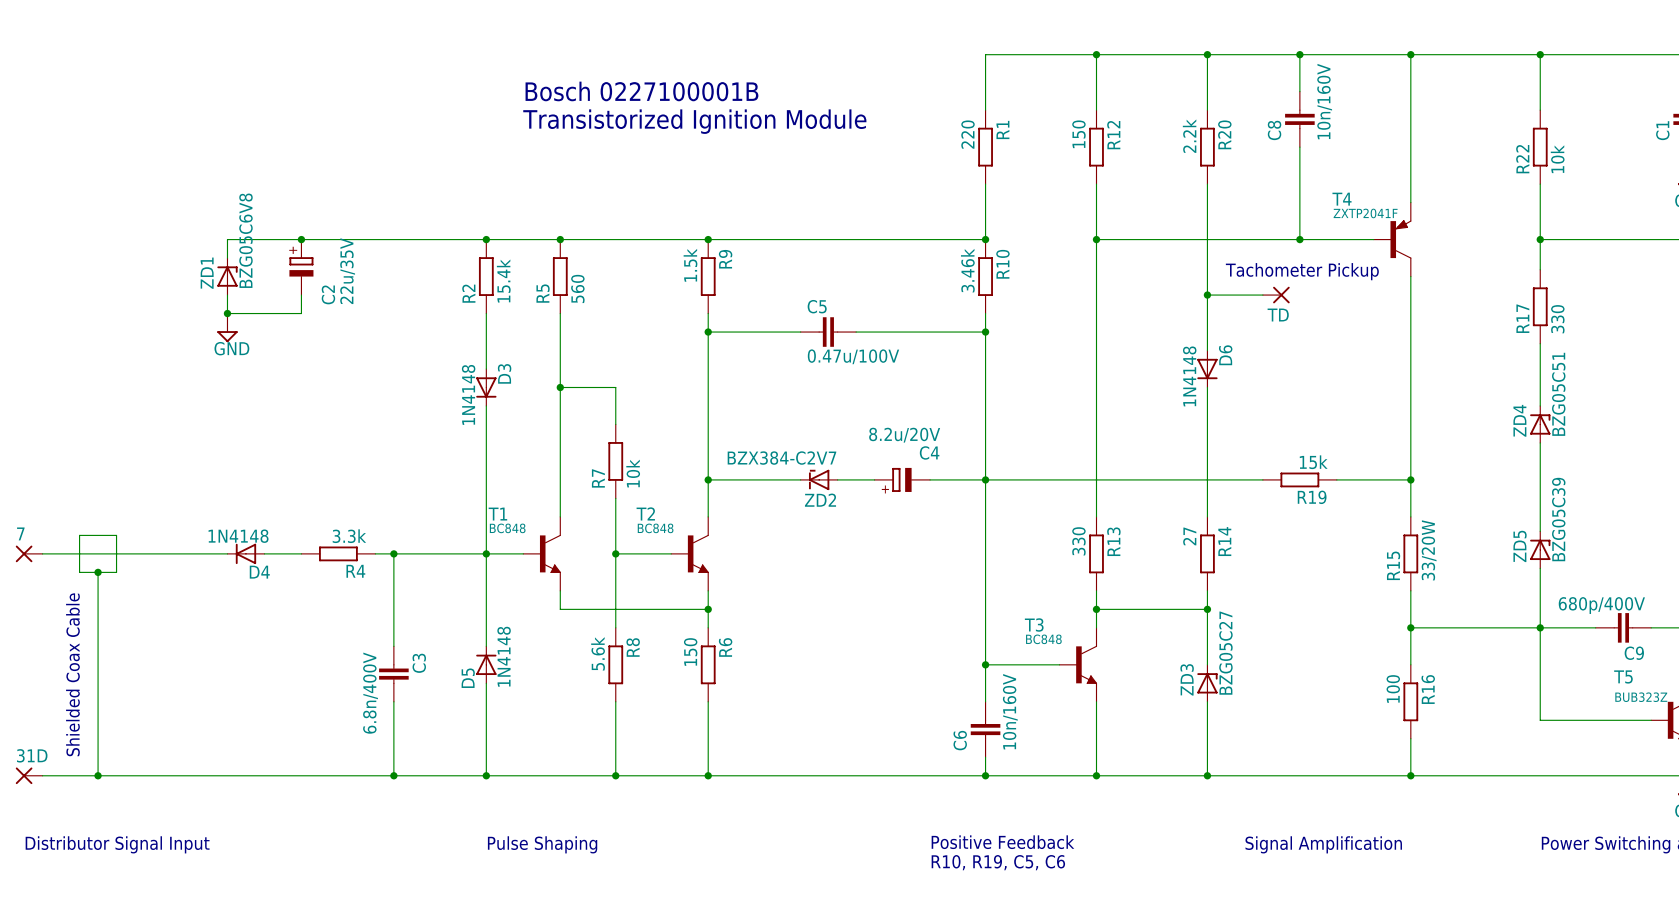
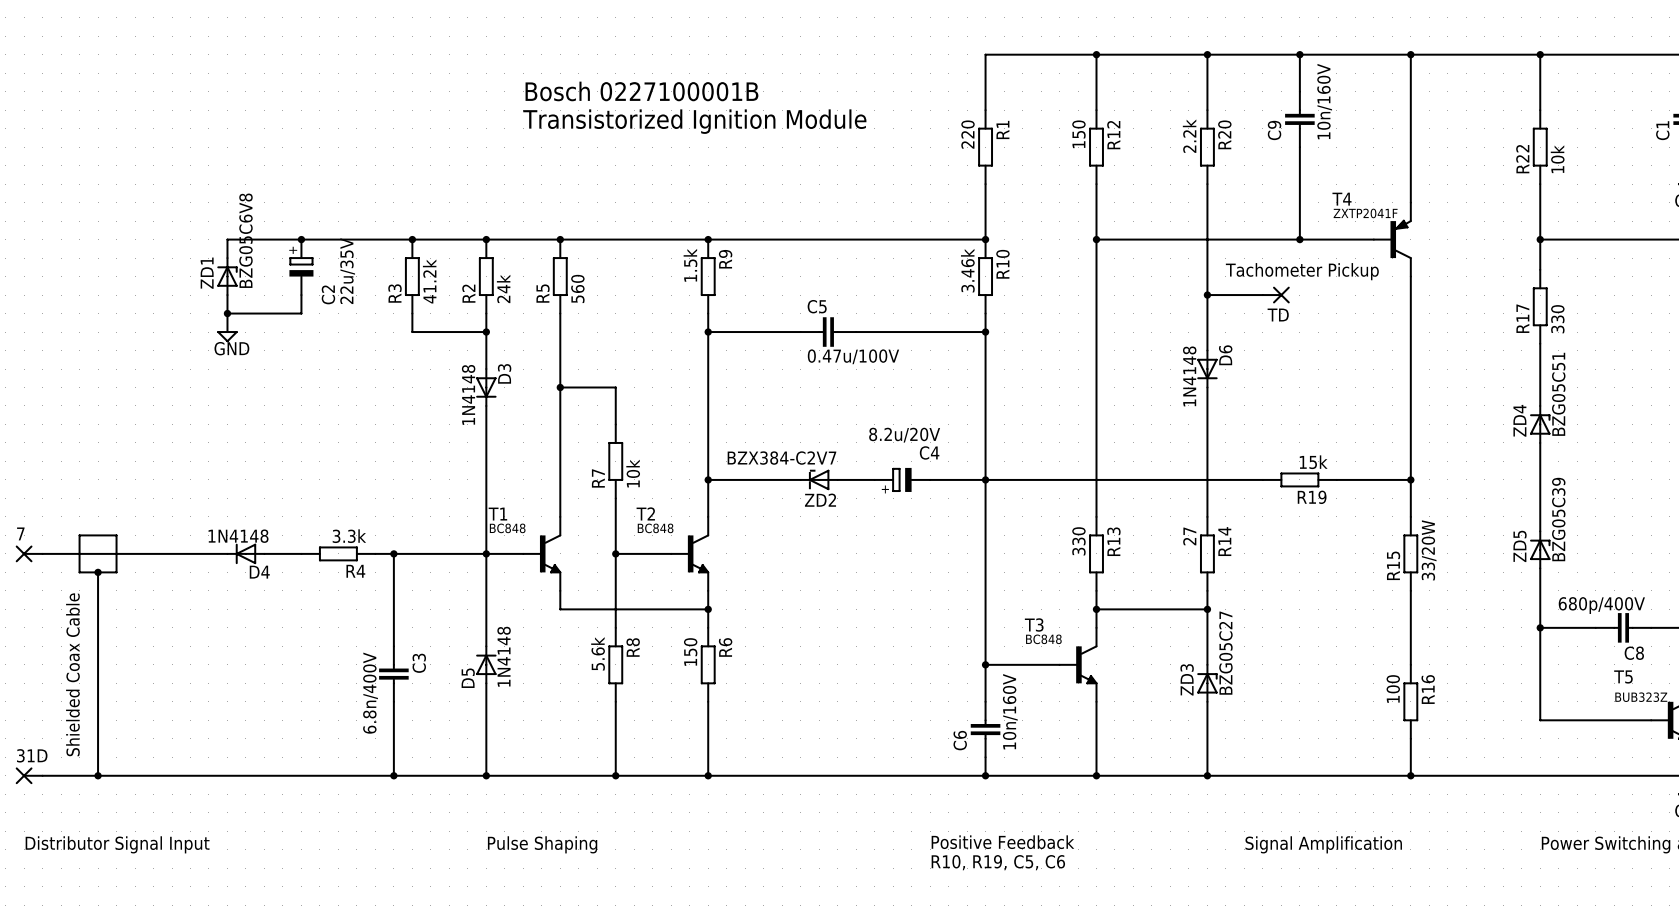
C8 name: C8 (1274, 130) -> C9 (1274, 130)
junction: none -> (412, 239)
R3: none -> 41.2k (412, 276)
R2 value: 15.4k (503, 281) -> 24k (503, 288)
wire: none -> (412, 313) (412, 332) (486, 332)
junction: none -> (486, 332)
wire: (1410, 627) (1540, 627) -> none
junction: (1410, 627) -> none
C9 name: C9 (1634, 653) -> C8 (1634, 653)

